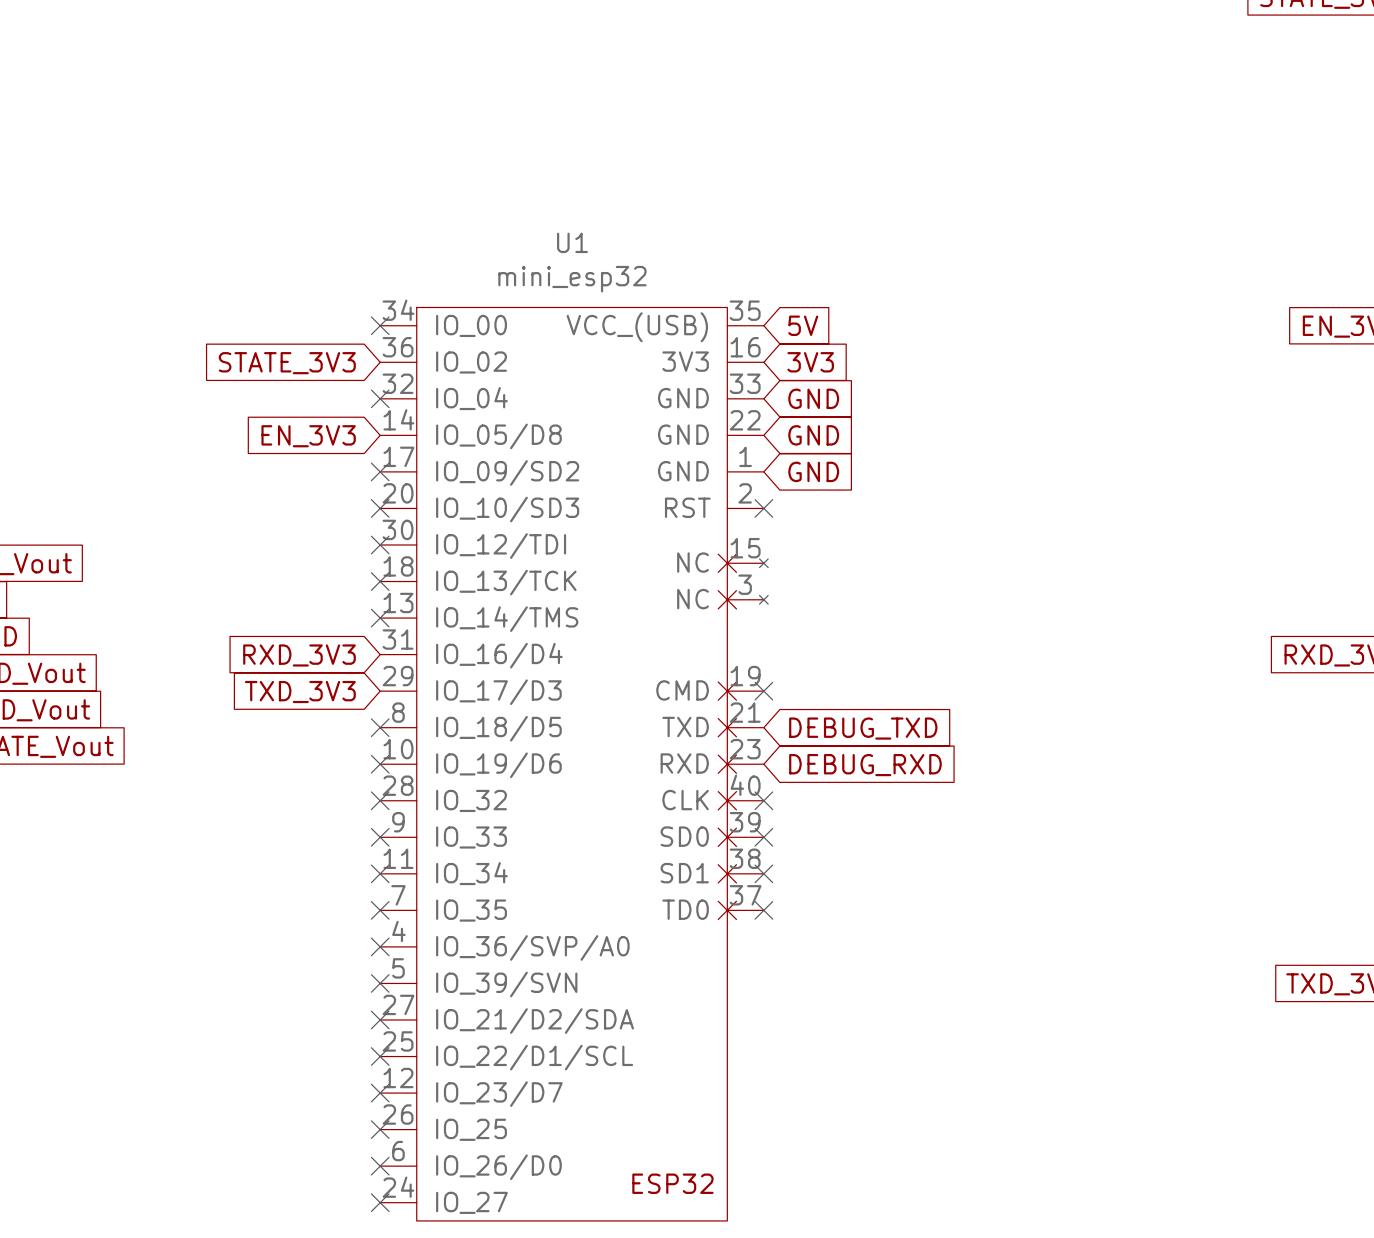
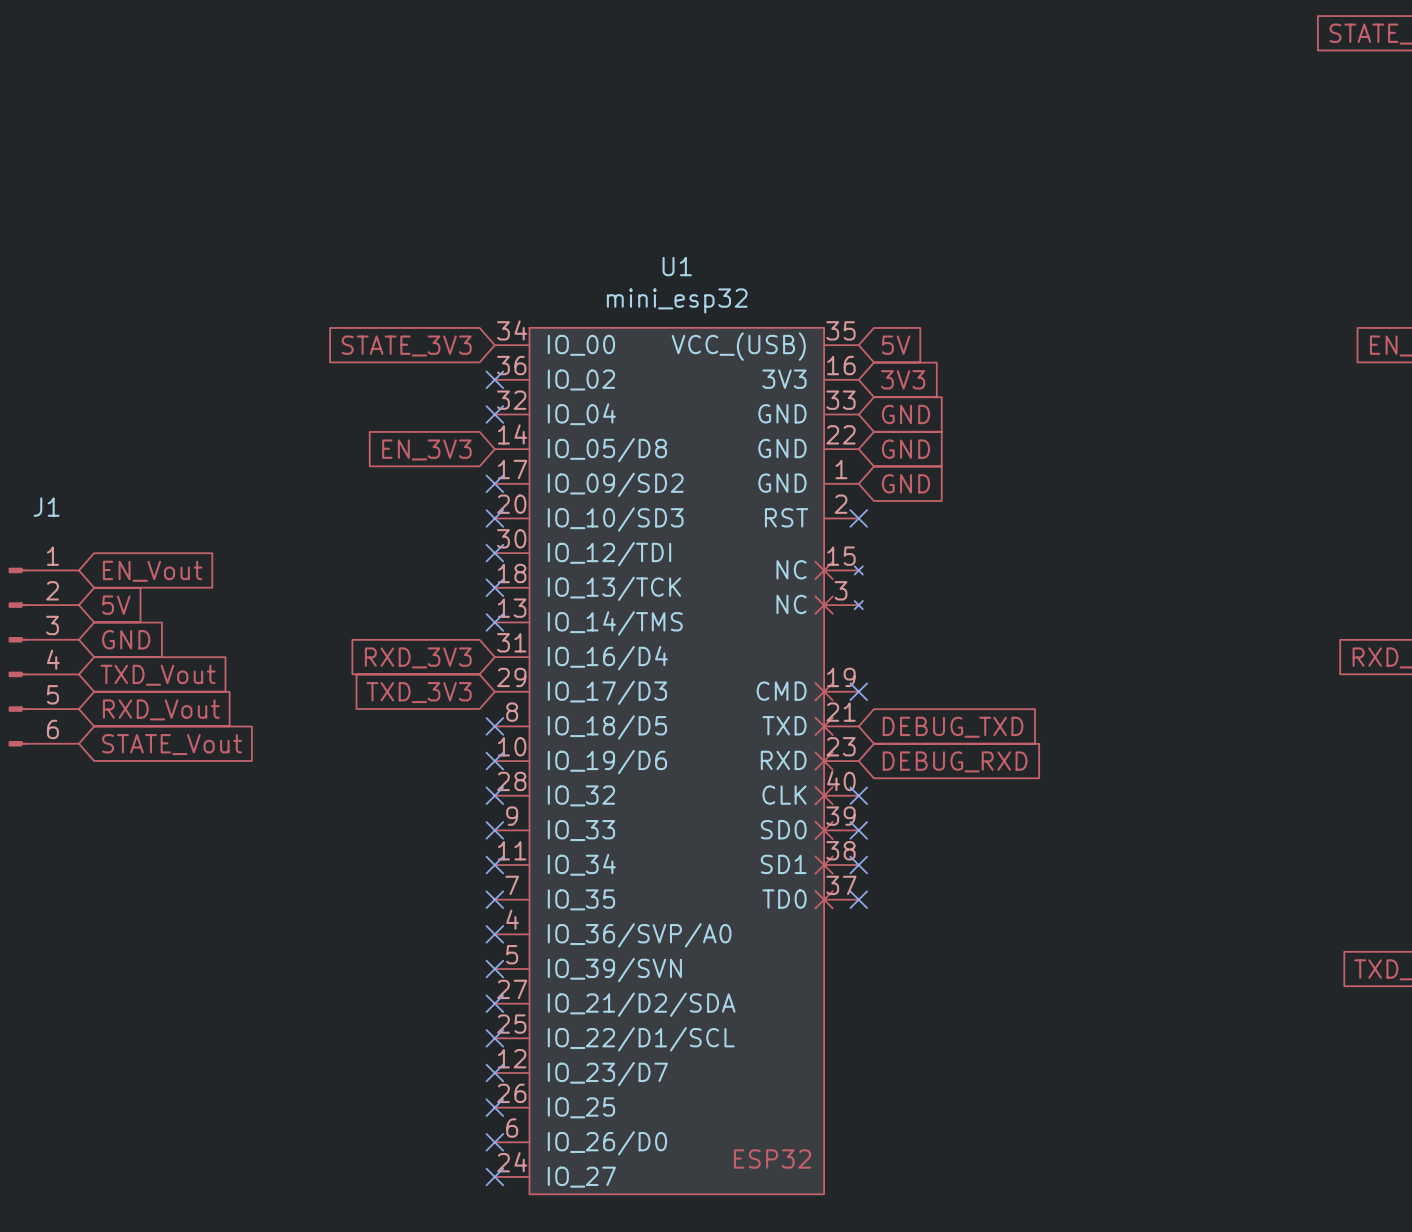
no-connect mark position: (380, 325) -> (494, 379)
global label position: STATE_3V3 (287, 363) -> STATE_3V3 (406, 345)

